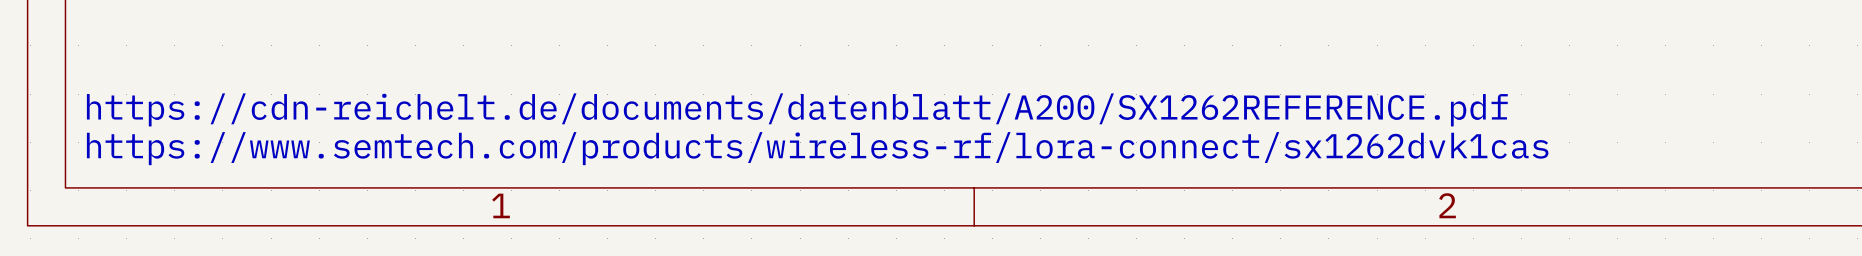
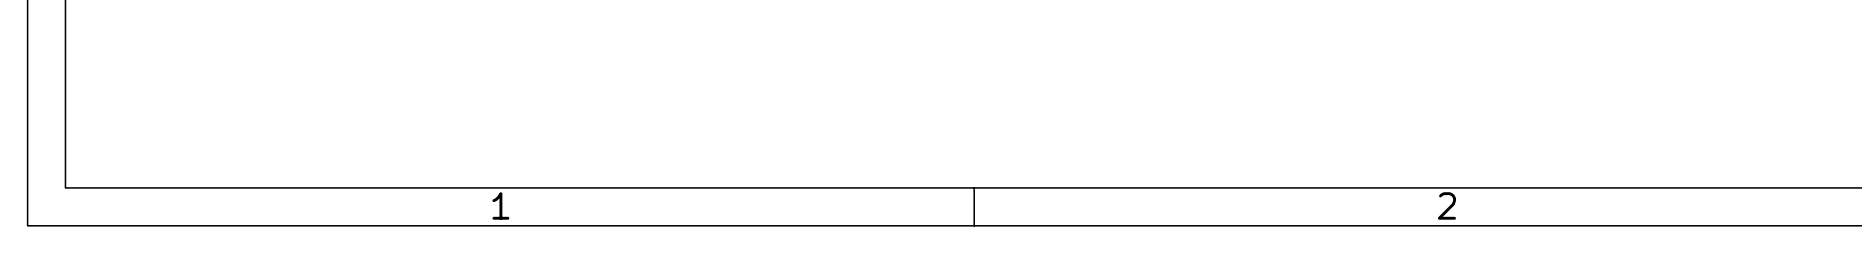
text: https://cdn-reichelt.de/documents/datenblatt/A200/SX1262REFERENCE.pdf (797, 109) -> none
text: https://www.semtech.com/products/wireless-rf/lora-connect/sx1262dvk1cas (817, 148) -> none

